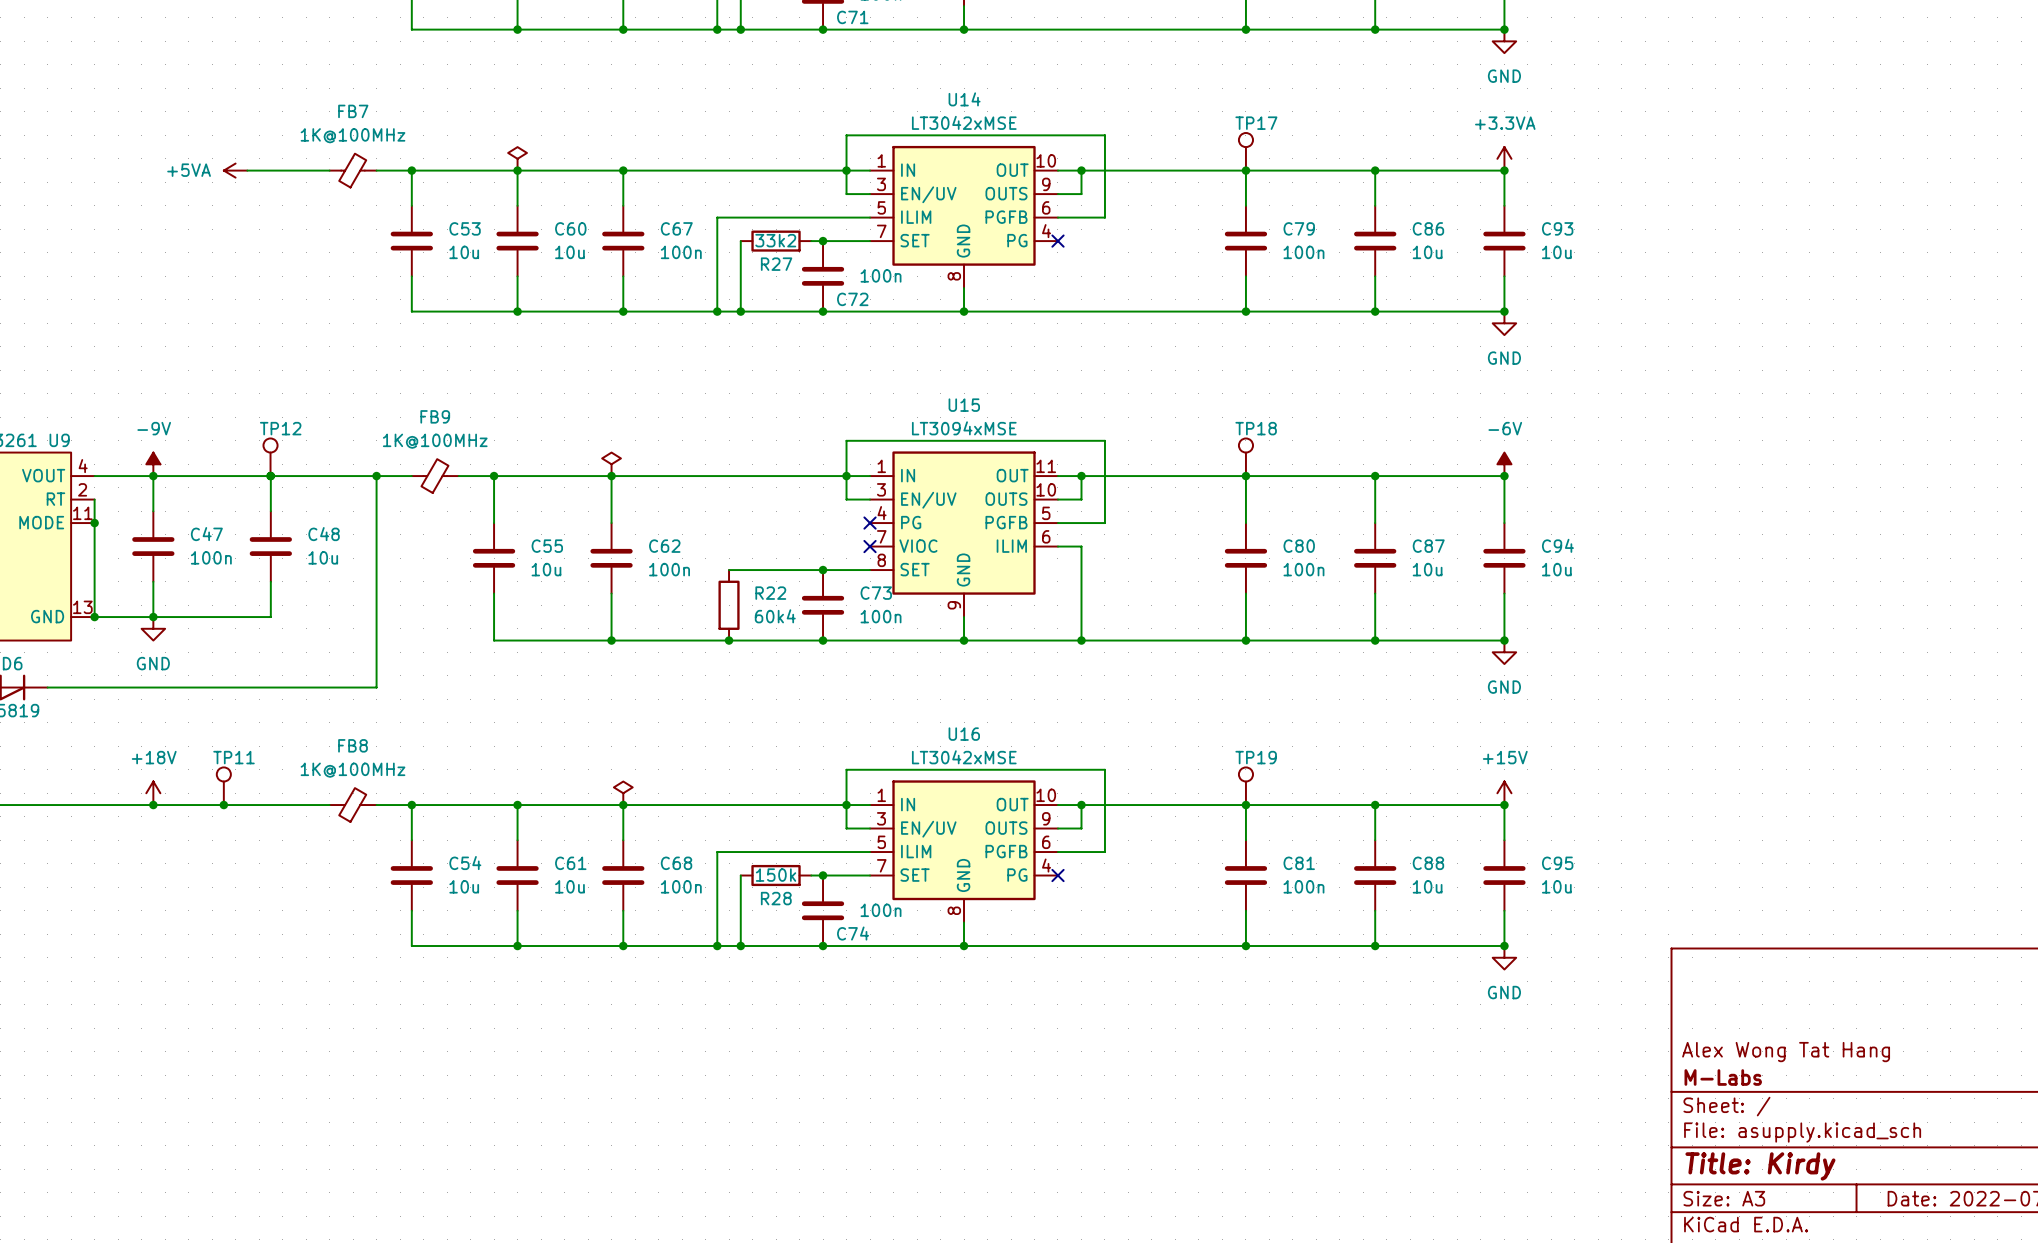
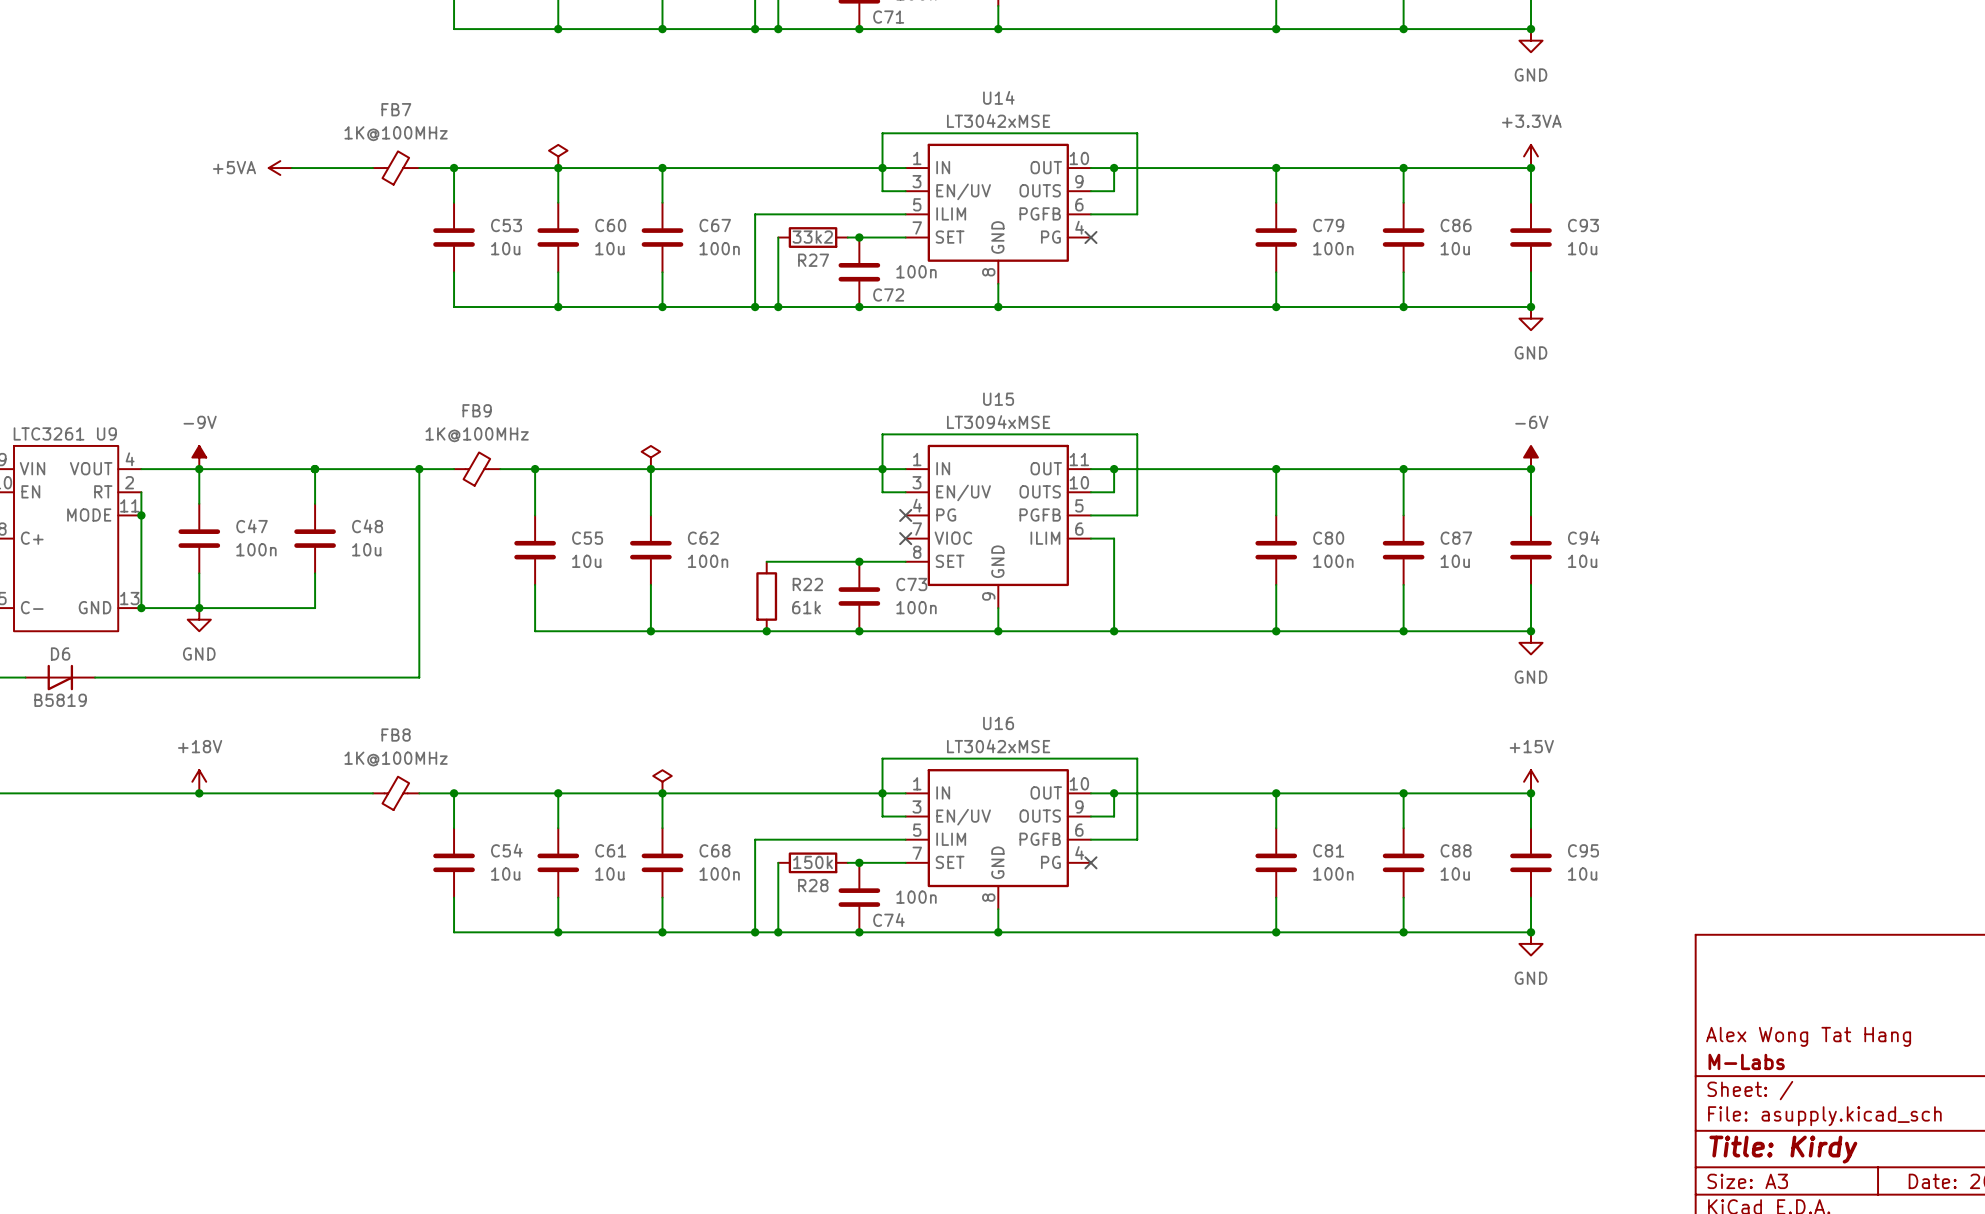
TP17: (1245, 151) -> none
TP12: (270, 457) -> none
TP18: (1245, 457) -> none
R22 value: 60k4 (775, 616) -> 61k (806, 607)
TP11: (223, 786) -> none
TP19: (1245, 786) -> none
junction: (223, 805) -> none

